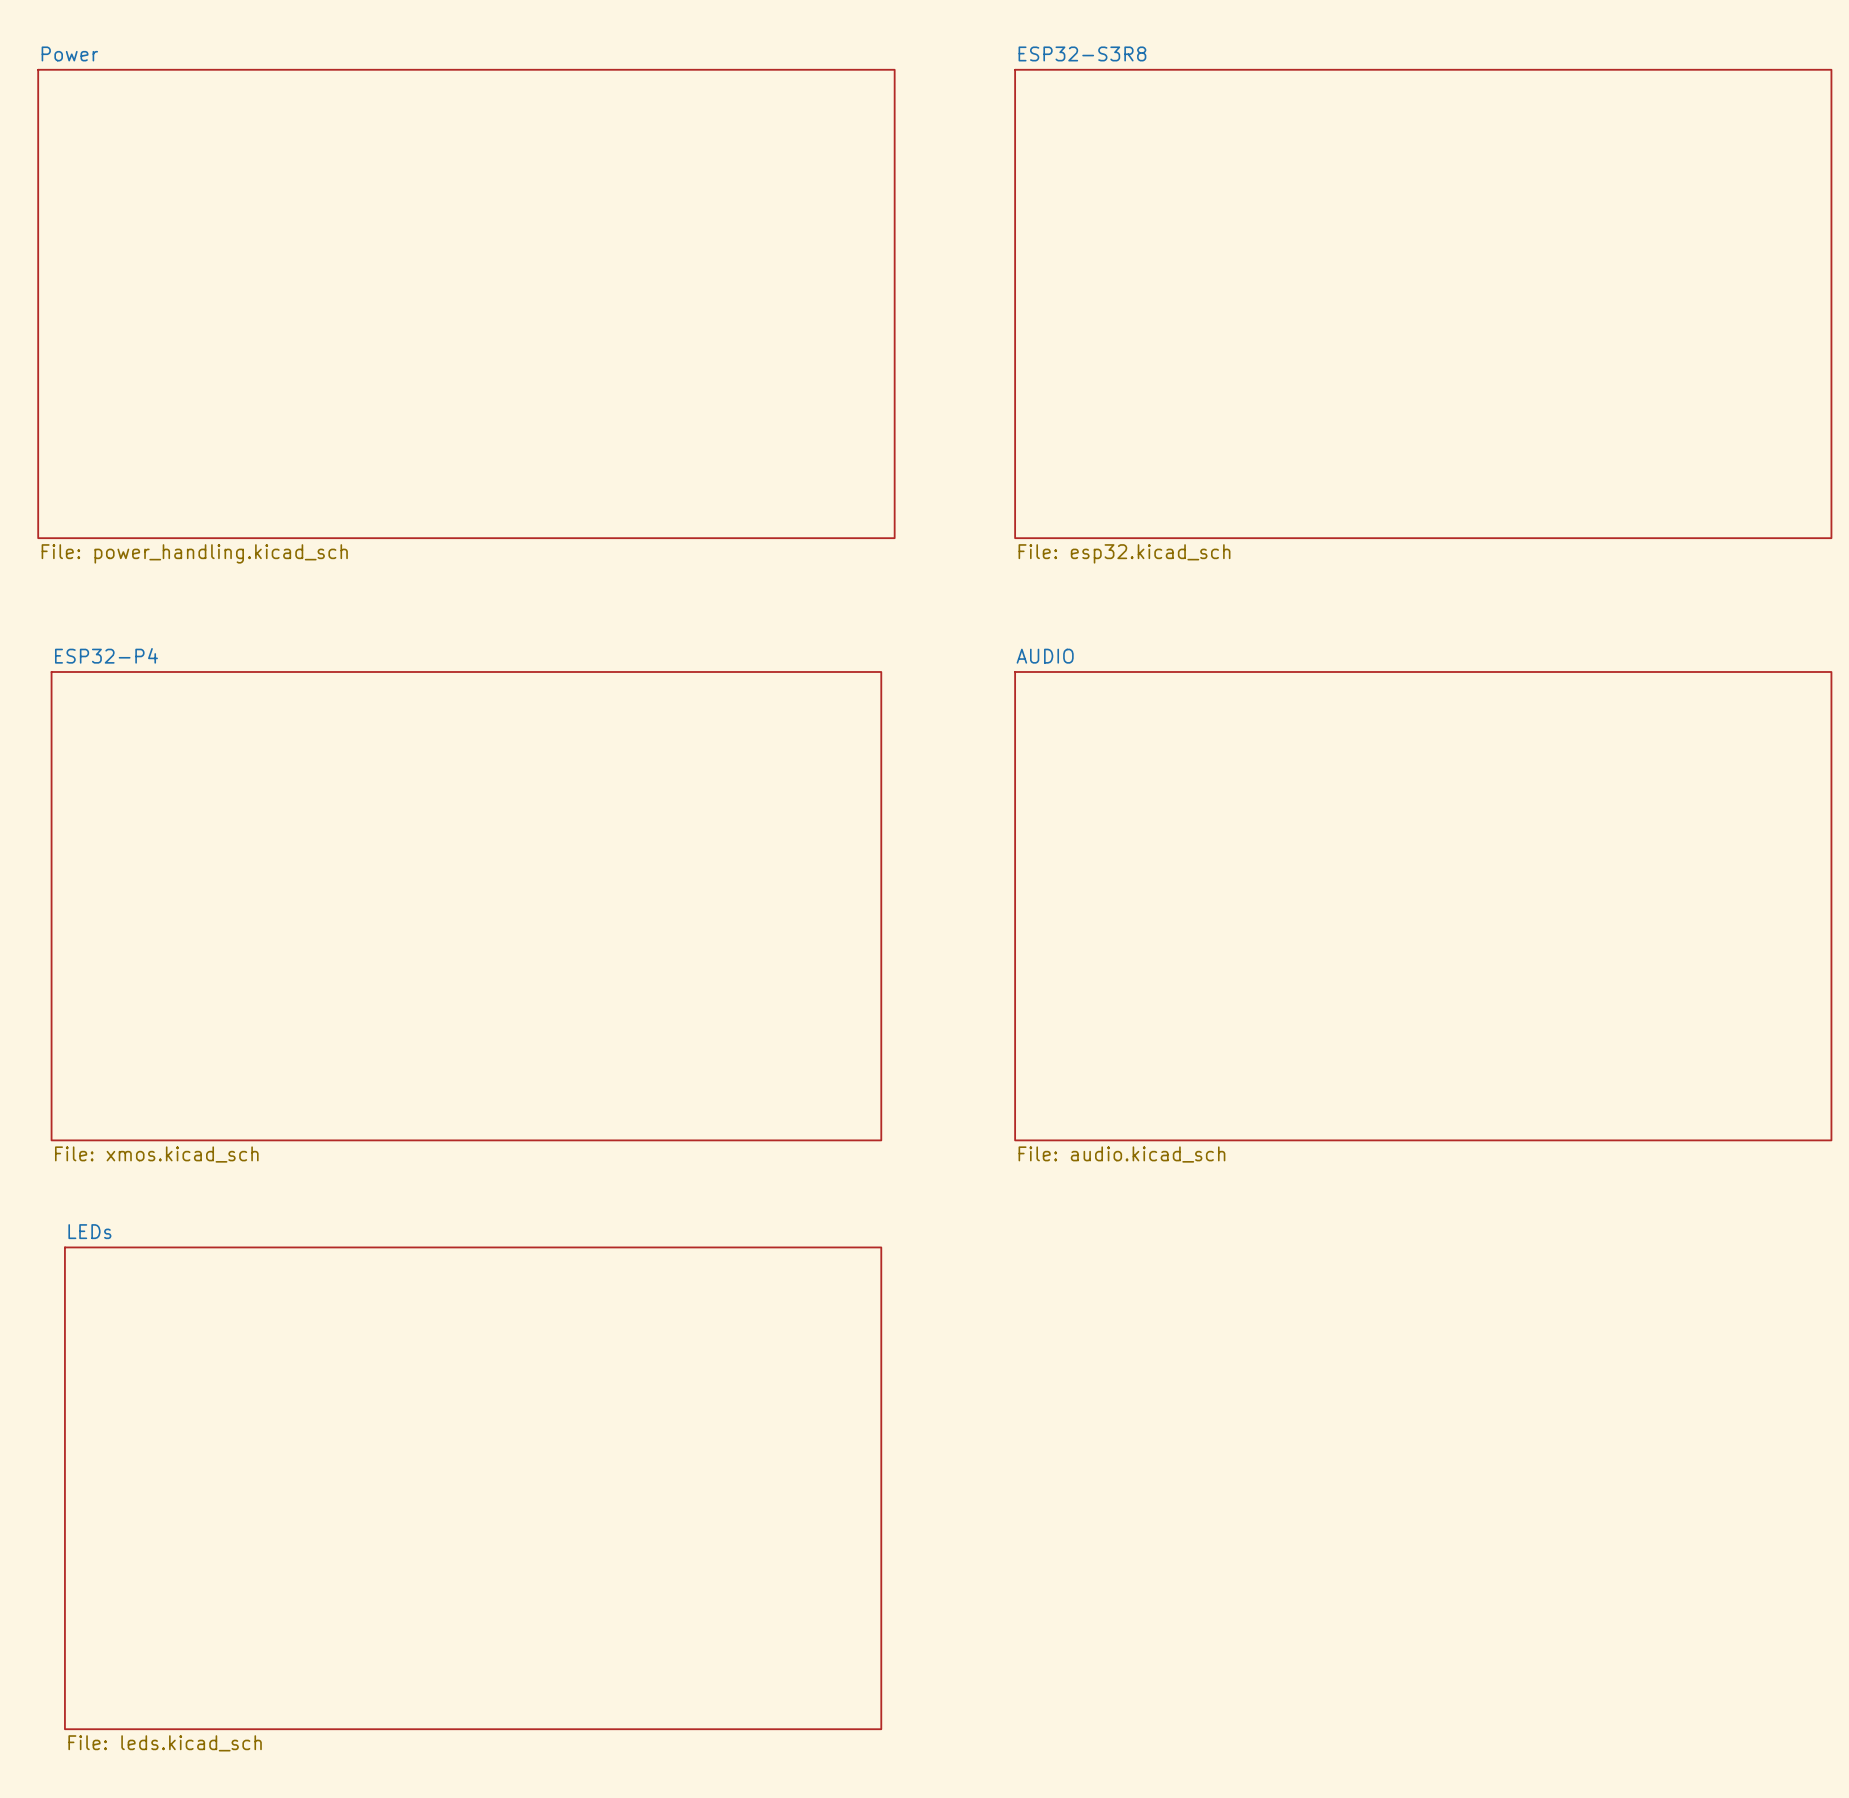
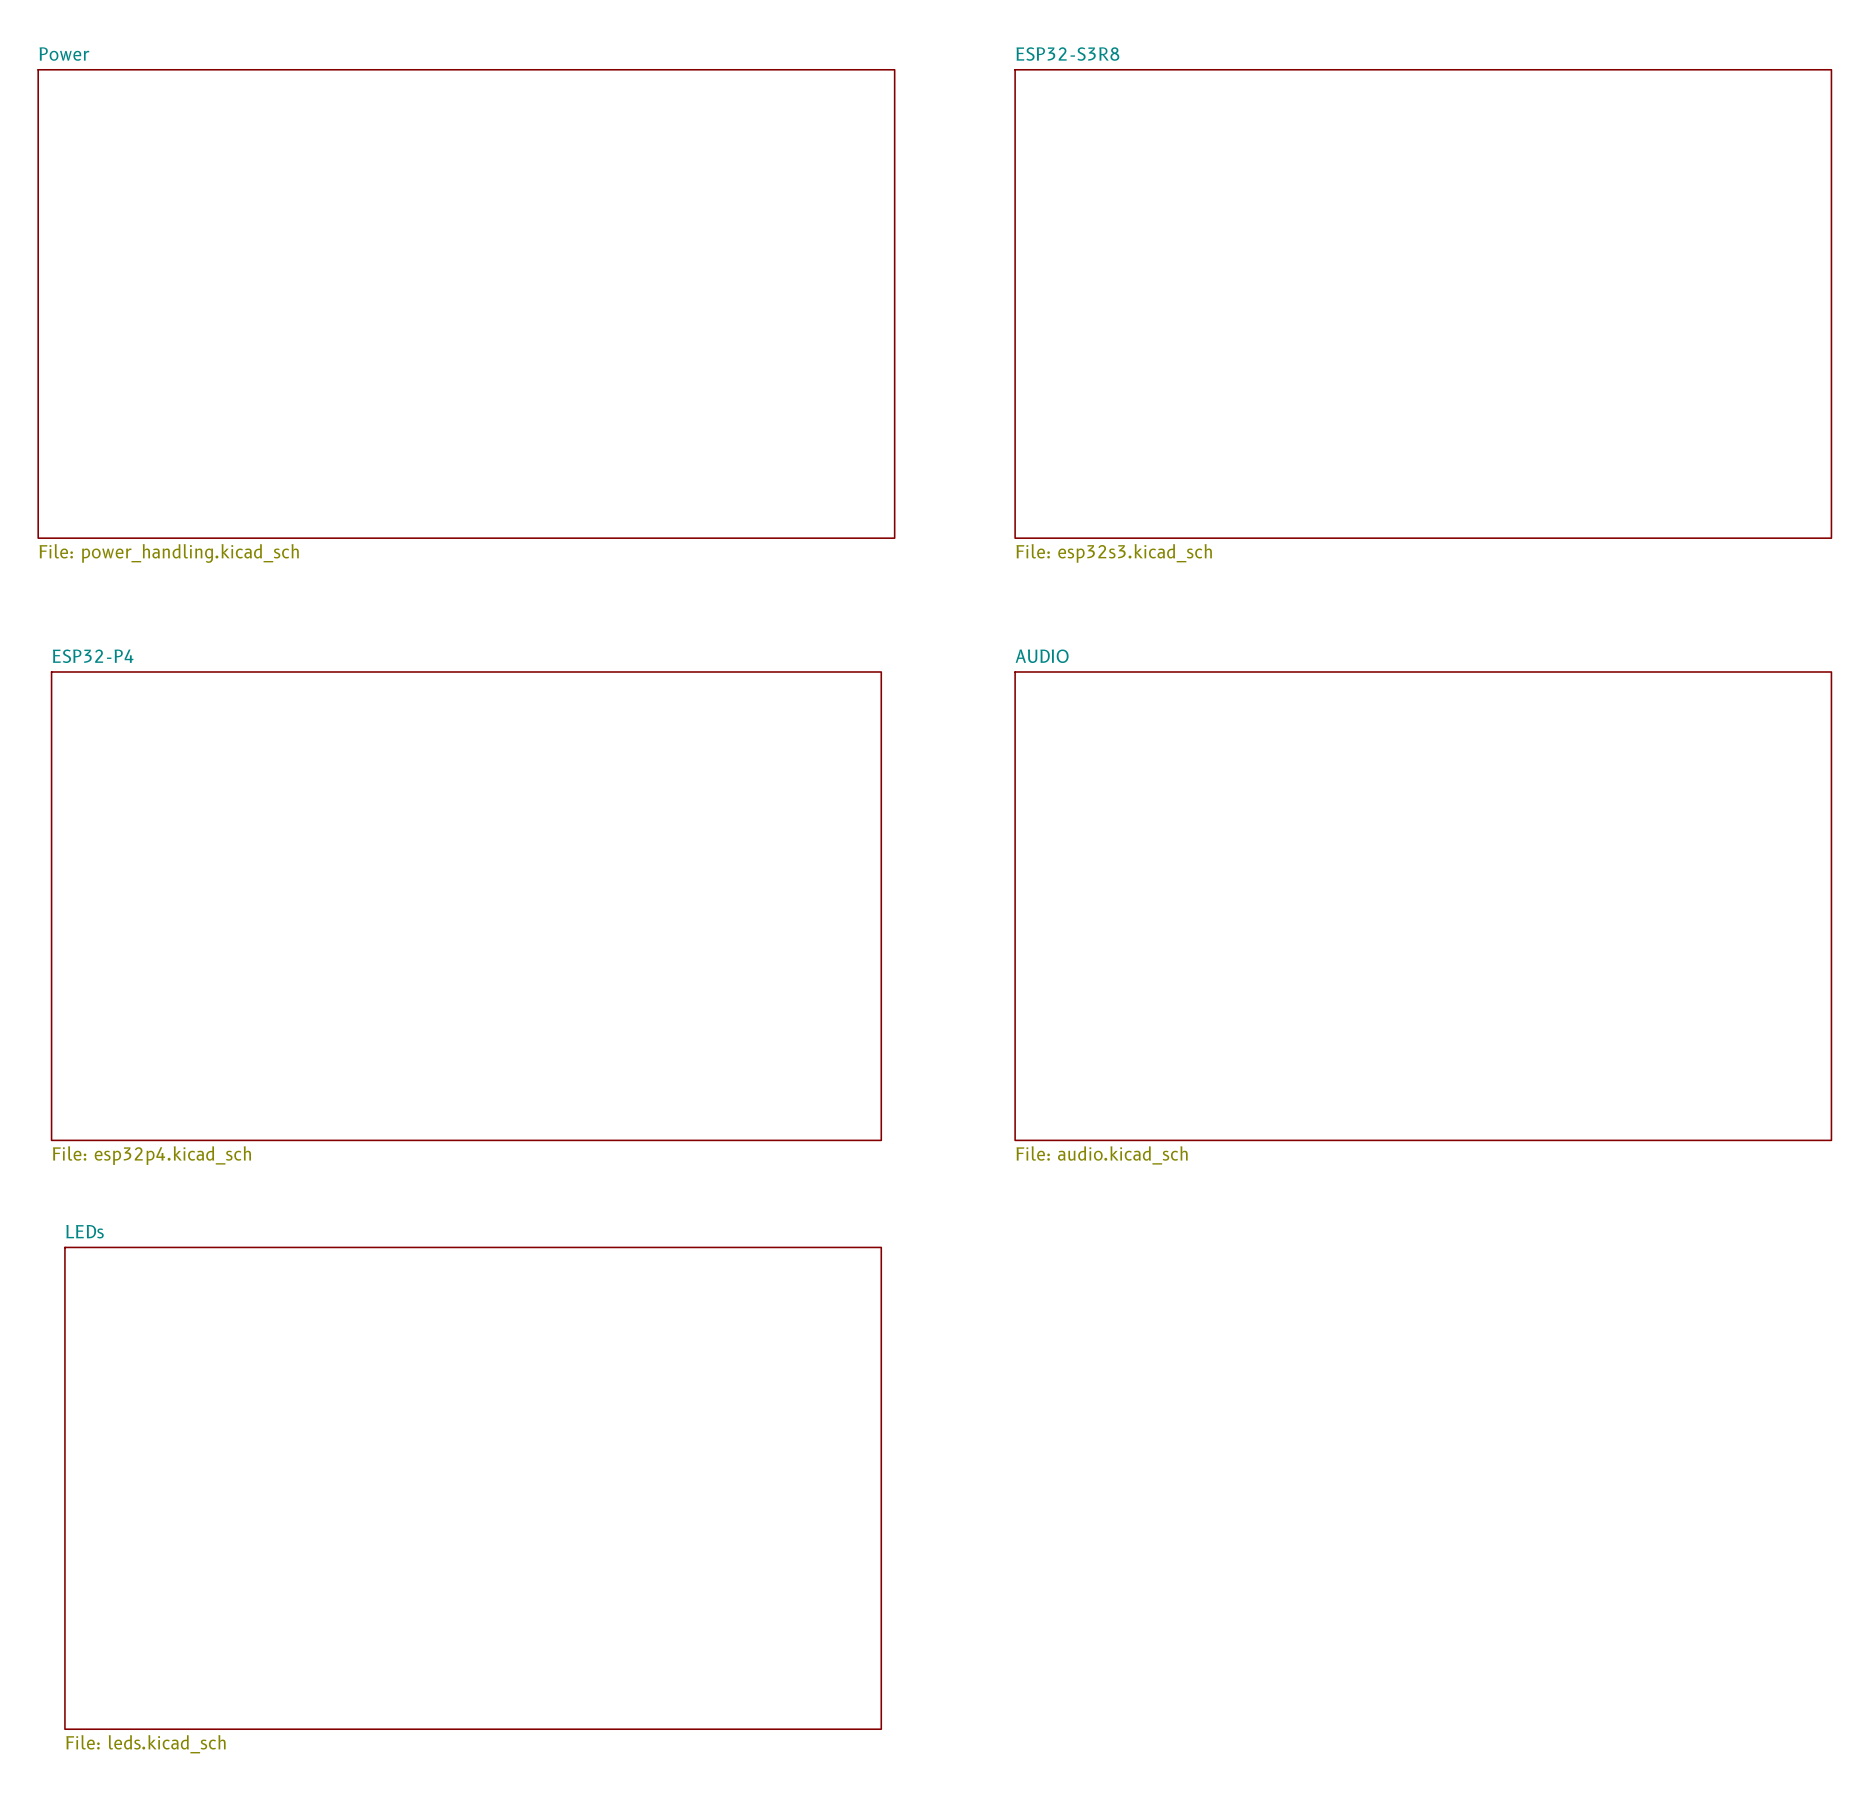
sheet ESP32-S3R8 value: File: esp32.kicad_sch (1124, 553) -> File: esp32s3.kicad_sch (1114, 553)
sheet ESP32-P4 value: File: xmos.kicad_sch (156, 1154) -> File: esp32p4.kicad_sch (151, 1155)

